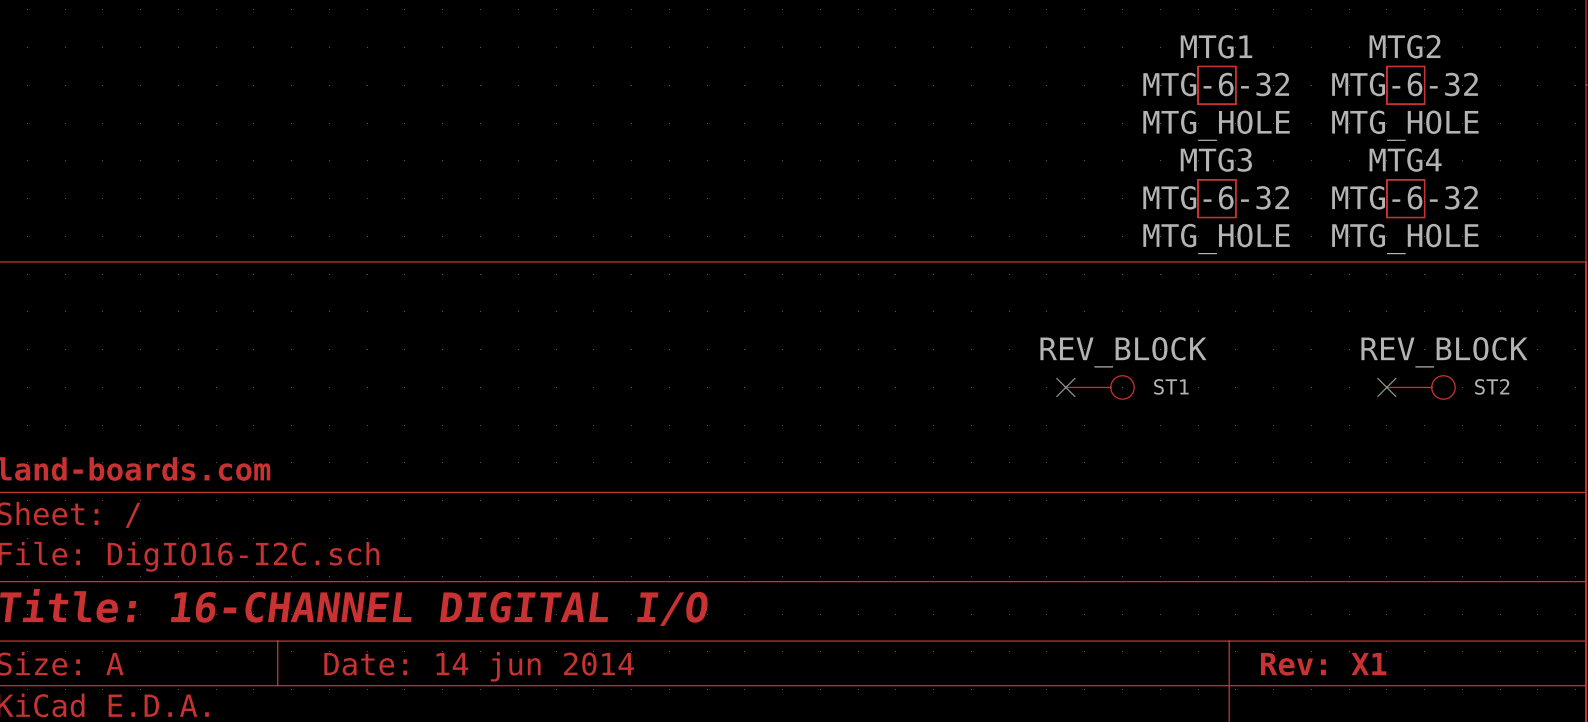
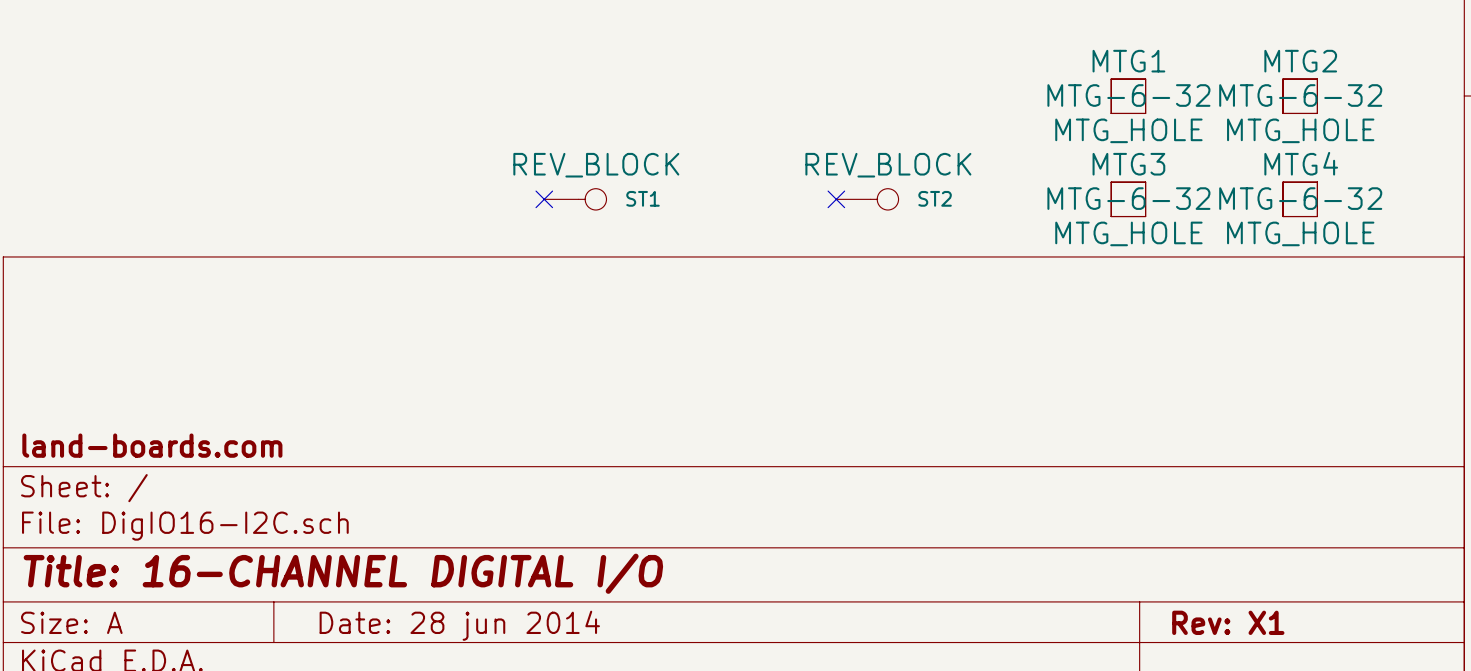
no-connect mark: none -> (544, 199)
no-connect mark: none -> (836, 199)
no-connect mark: (1065, 387) -> none
ST1 position: (1100, 387) -> (575, 199)
no-connect mark: (1386, 387) -> none
ST2 position: (1420, 387) -> (867, 199)
title block: Date: 14 jun 2014 (479, 666) -> Date: 28 jun 2014 (459, 625)

